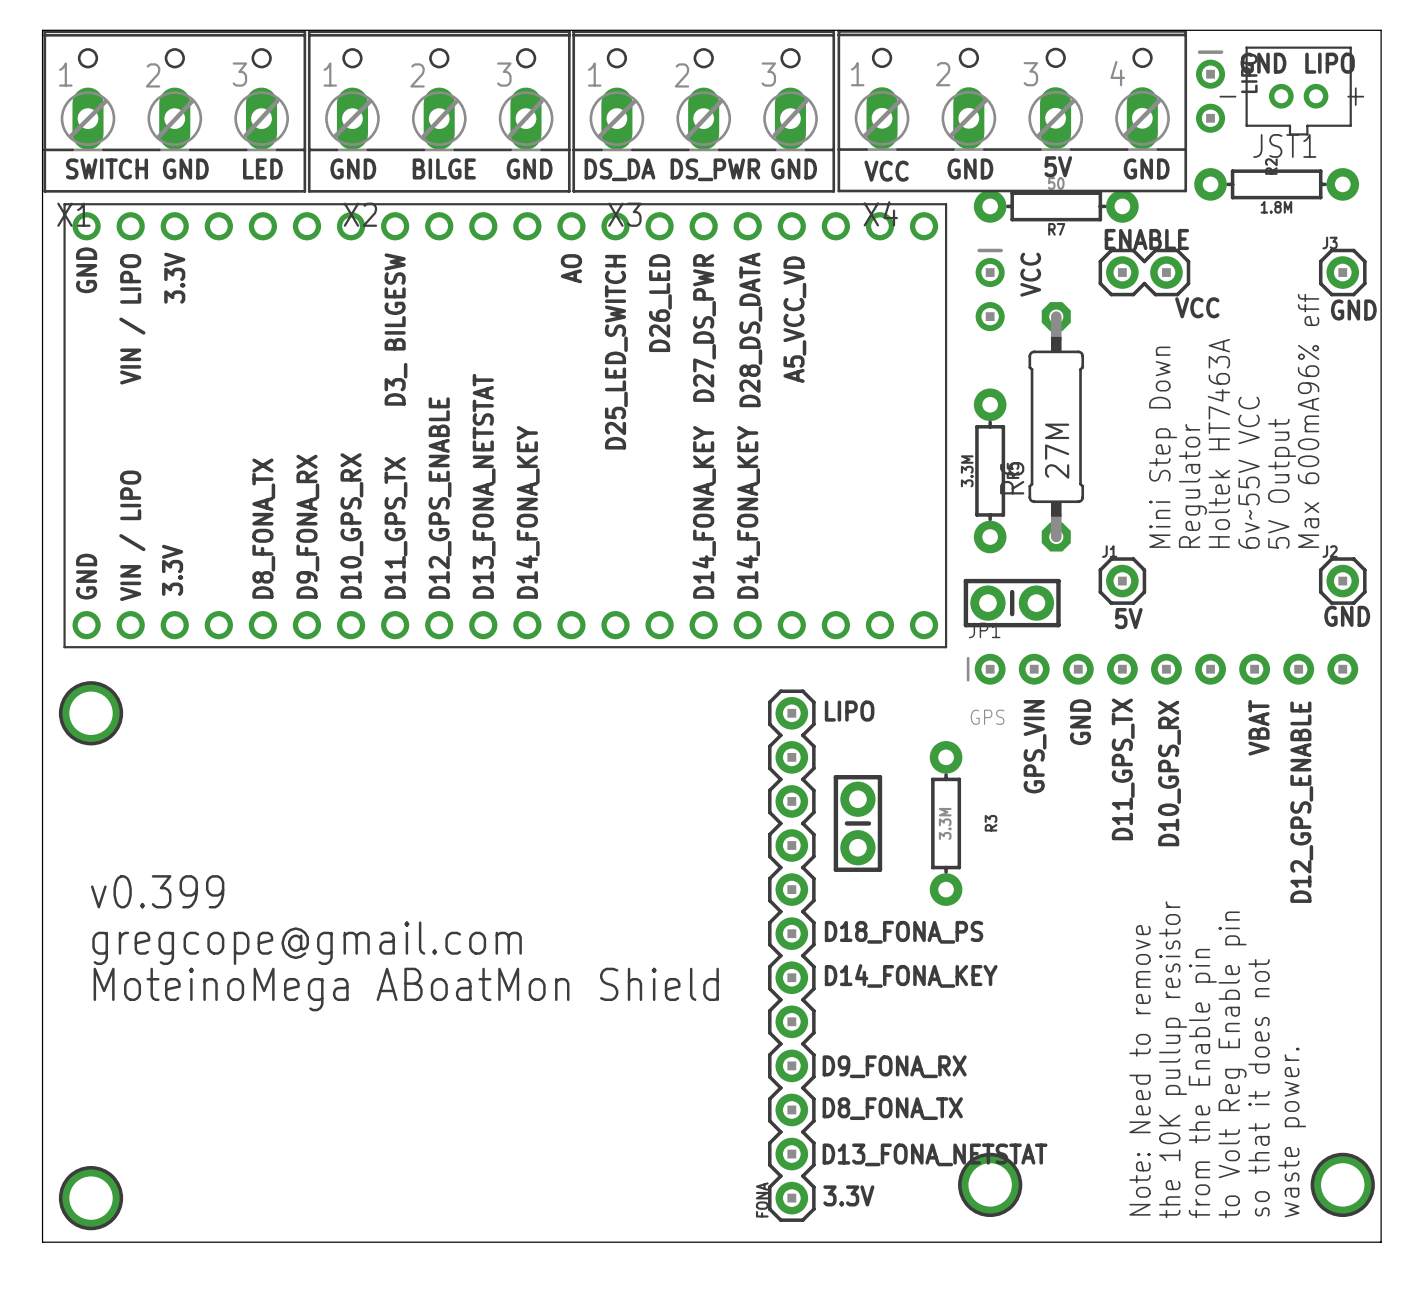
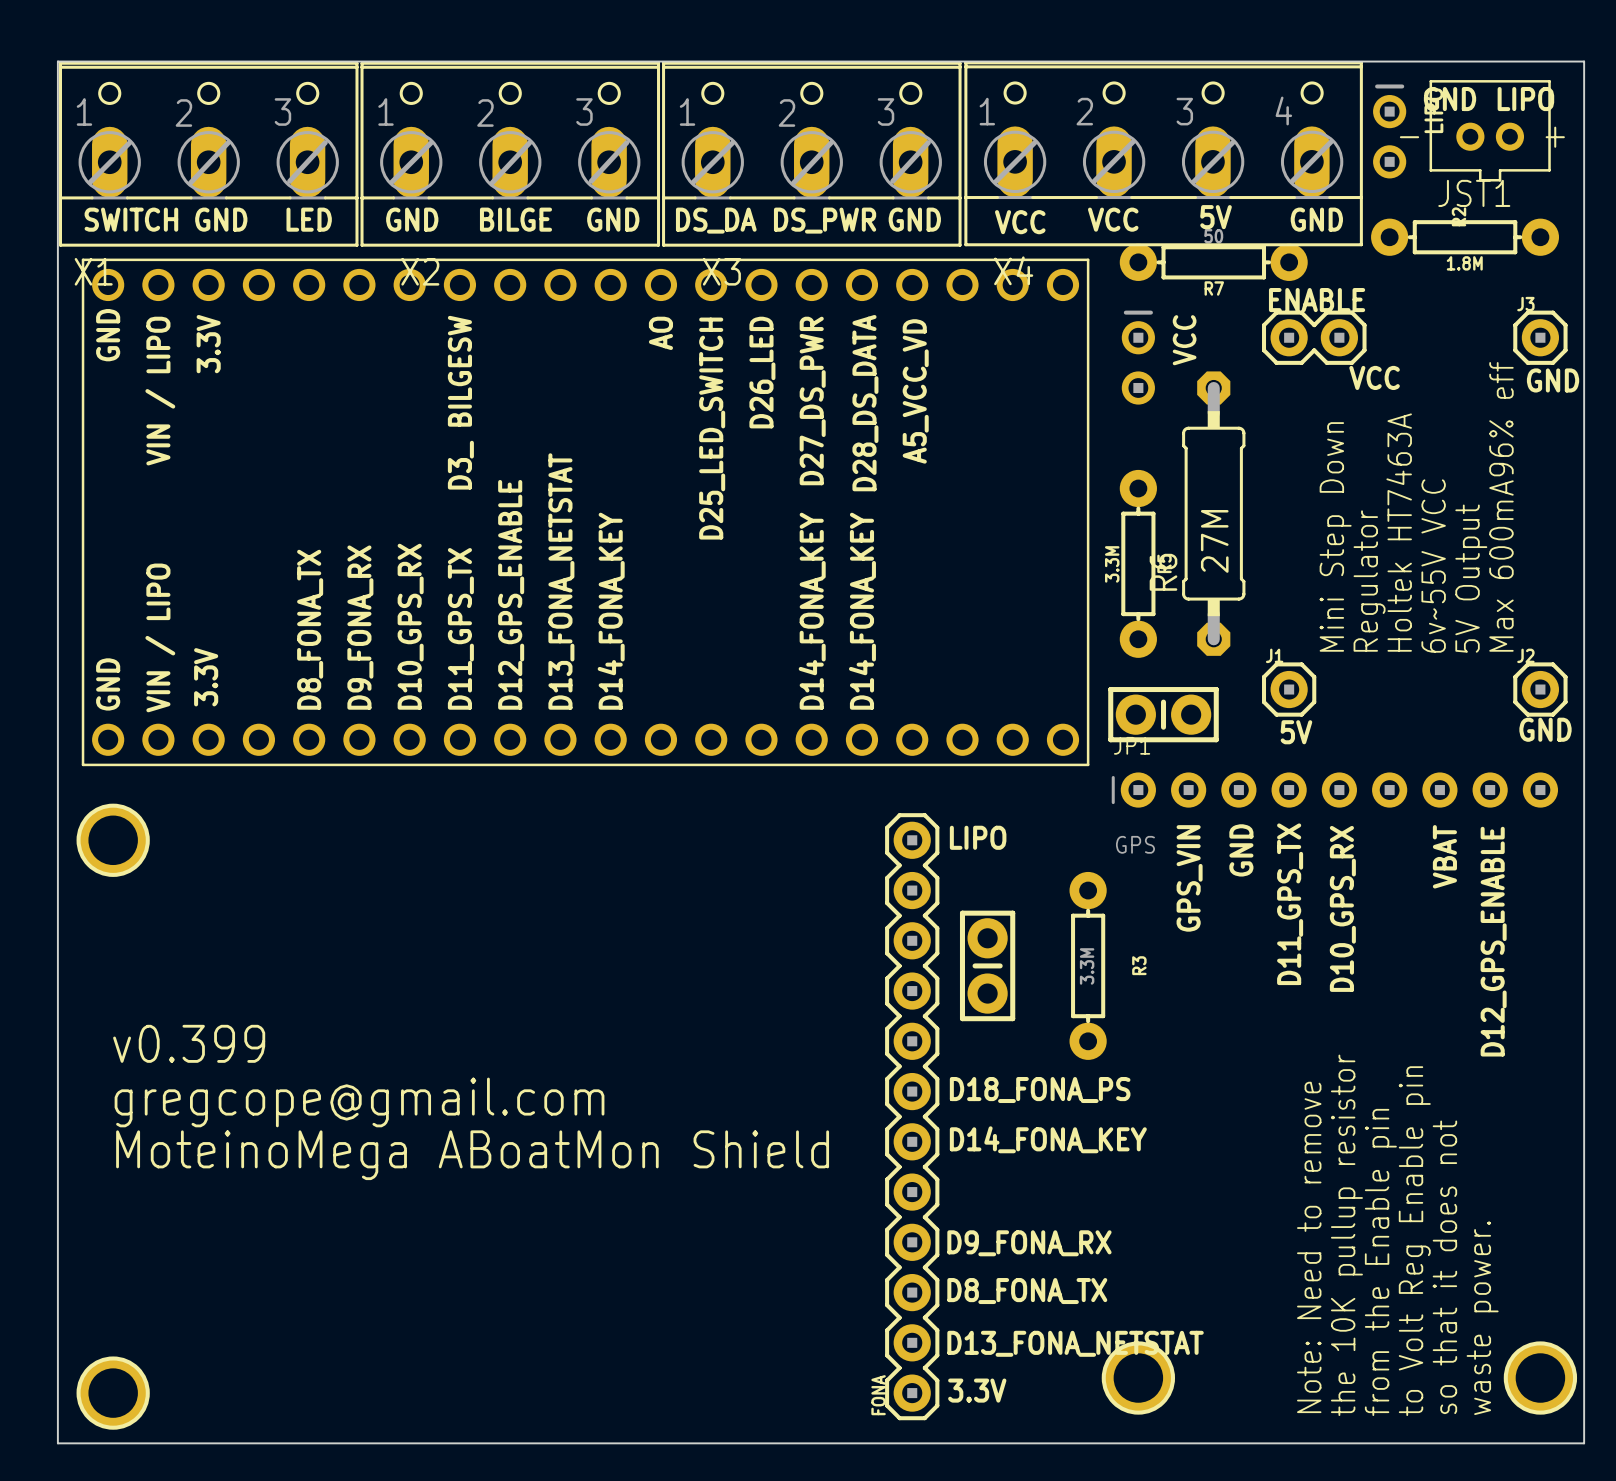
text: GND (970, 168) -> VCC (1113, 219)

